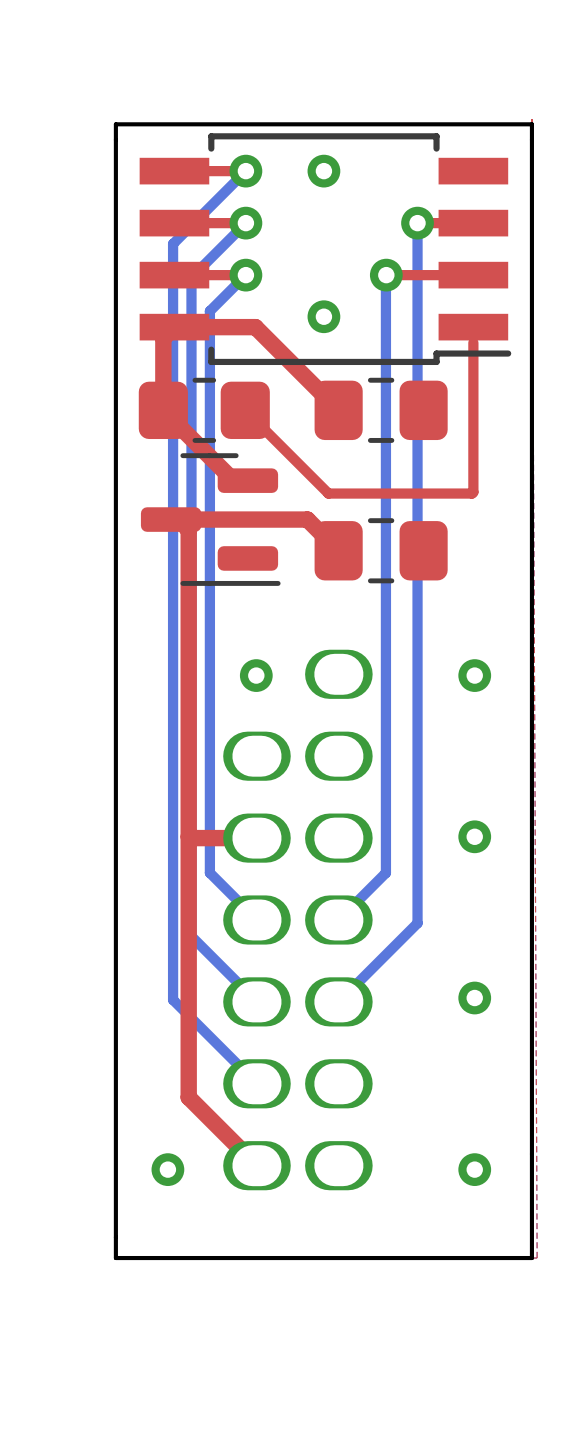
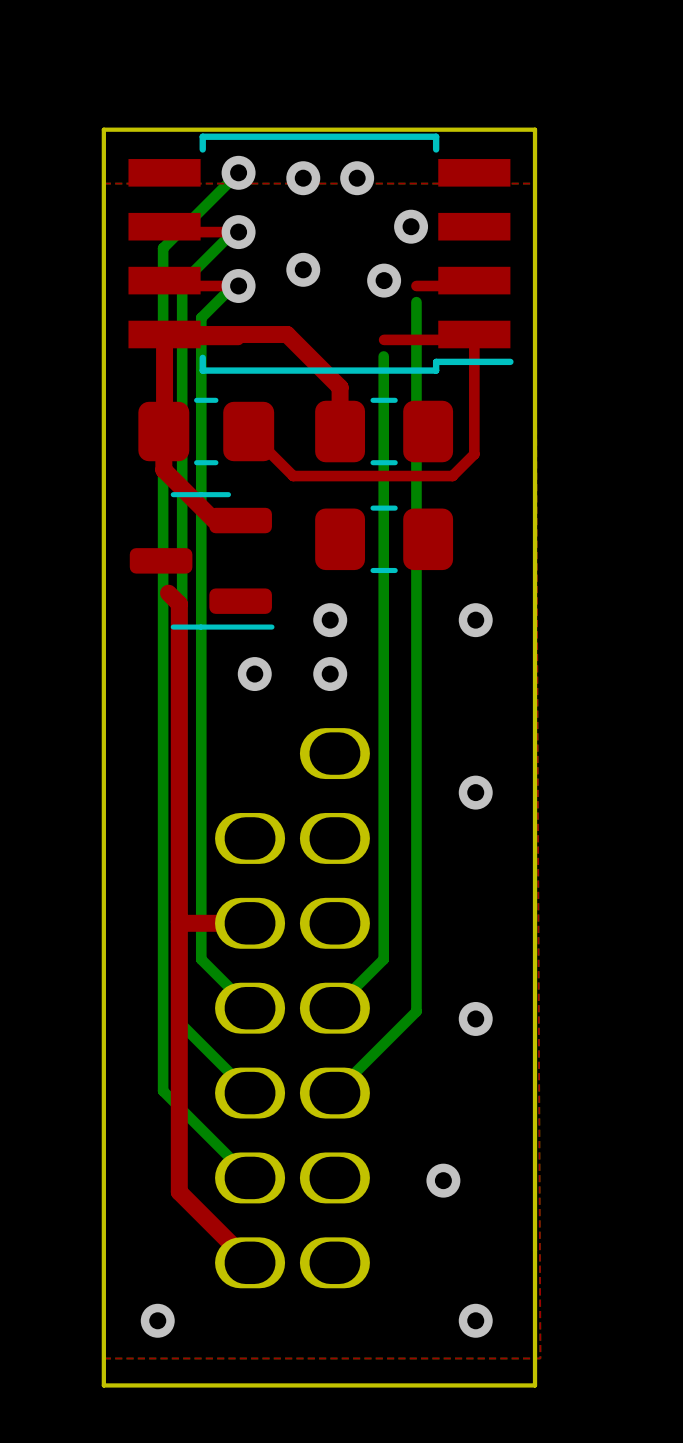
via: none -> (238, 172)
via: none -> (303, 178)
via: none -> (357, 178)
board edge: (115, 124) (531, 124) -> (103, 183) (103, 129) (535, 129) (535, 183)
via: none -> (411, 226)
bottom track: (245, 171) (173, 243) -> (238, 172) (163, 248) (163, 307)
via: (323, 171) -> none
via: none -> (303, 269)
bottom track: (245, 223) (191, 277) -> (238, 226) (182, 283) (182, 342)
via position: (417, 223) -> (384, 280)
part position: (325, 249) -> (321, 253)
top track: none -> (474, 334) (474, 409)
bottom track: (245, 275) (209, 311) -> (238, 280) (201, 317) (201, 377)
via: (245, 275) -> none
via: (386, 275) -> none
via: (323, 316) -> none
top track: none -> (340, 431) (340, 387) (287, 334) (164, 334) (164, 441)
part: none -> (384, 431)
top track: none -> (163, 432) (163, 469) (214, 520) (240, 520)
top track: (473, 385) (472, 493) (328, 493) (245, 410) -> (474, 454) (452, 476) (293, 476) (248, 431)
part position: (204, 410) -> (206, 431)
top track: (338, 410) (255, 327) (174, 327) (163, 338) (163, 410) (233, 480) (247, 480) -> none
part: (381, 410) -> none
part: none -> (384, 539)
top track: (171, 519) (307, 519) (338, 550) -> none
part position: (210, 519) -> (202, 560)
via: none -> (330, 620)
via: none -> (475, 620)
part: (381, 550) -> none
via: none -> (254, 674)
via: none -> (330, 674)
via: (256, 675) -> none
via position: (474, 675) -> (475, 792)
via: (474, 836) -> none
via: none -> (475, 1018)
via: (474, 998) -> none
via: none -> (443, 1180)
via position: (167, 1169) -> (157, 1320)
via: (474, 1169) -> none
via: none -> (475, 1320)
board edge: (115, 1258) (531, 1258) -> (103, 1358) (103, 1385) (535, 1385) (535, 1358)

